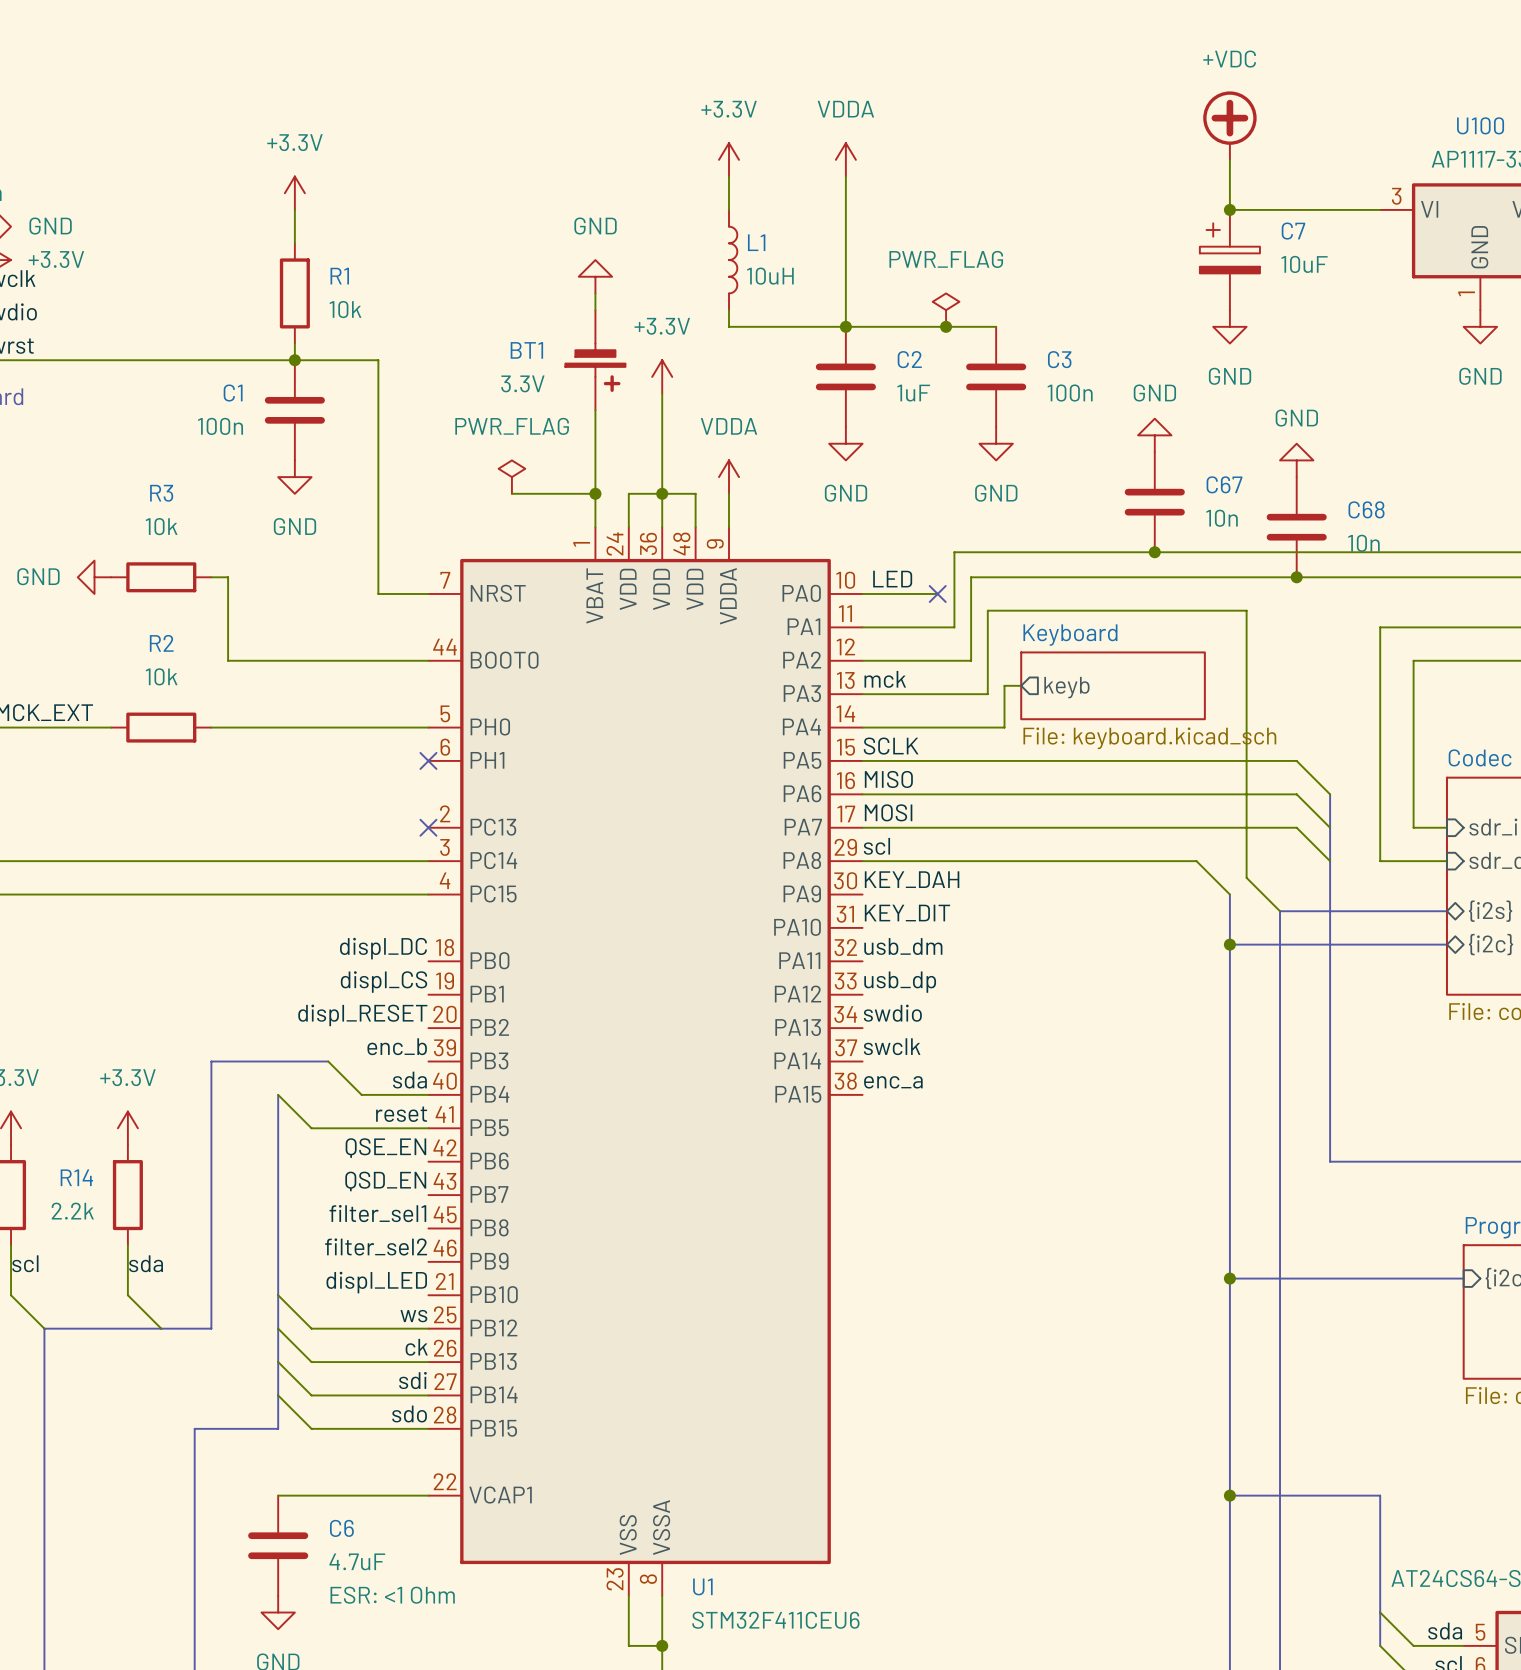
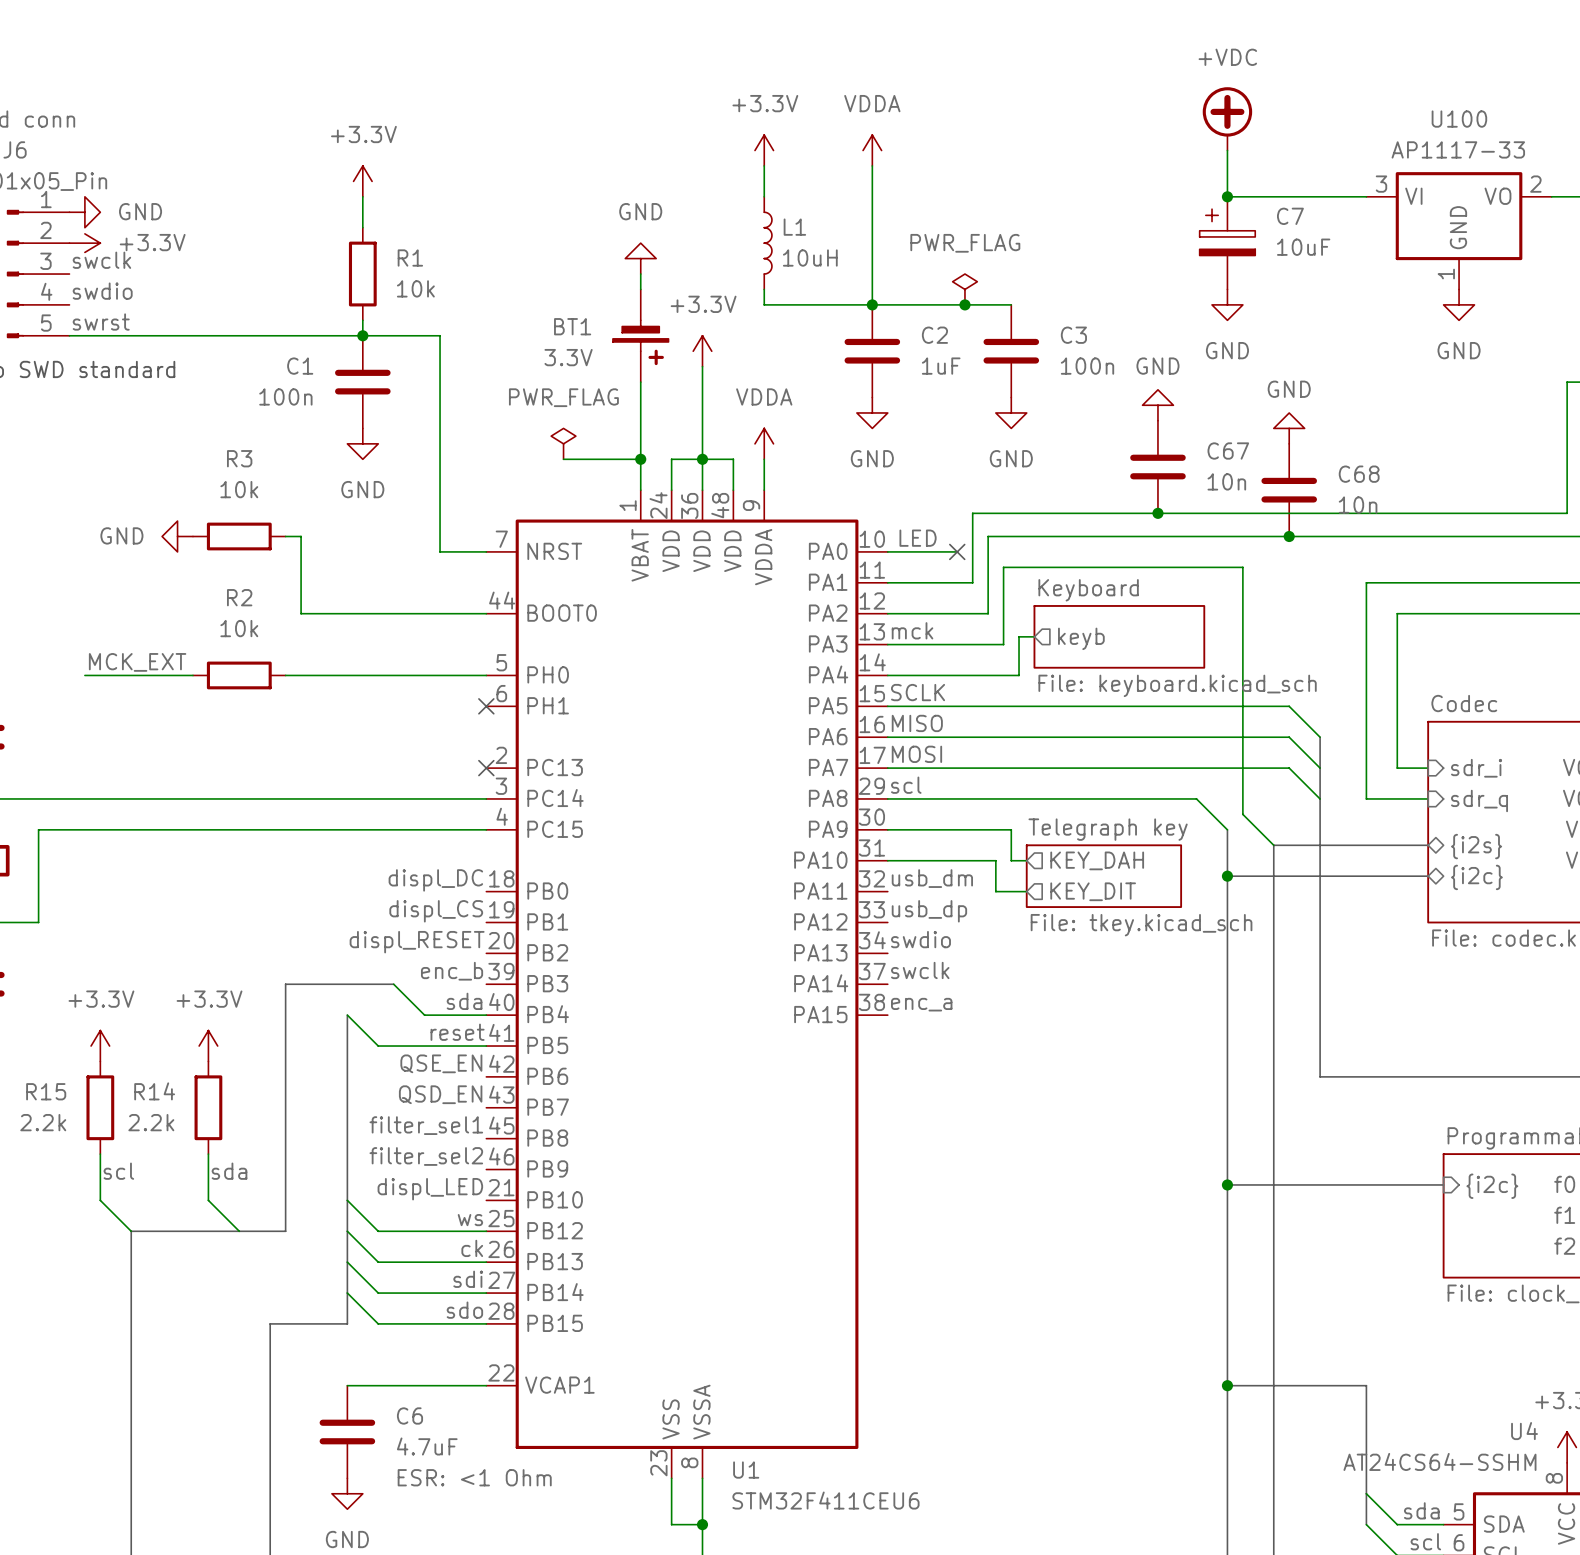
label: KEY_DAH (912, 879) -> none
wire: none -> (887, 829) (1011, 829) (1011, 860) (1026, 860)
label: KEY_DIT (907, 913) -> none
wire: none -> (887, 860) (995, 860) (995, 891) (1026, 891)
sheet pin: none -> KEY_DAH (1097, 860)
sheet Telegraph key: none -> File: tkey.kicad_sch (1103, 876)
sheet pin: none -> KEY_DIT (1093, 891)

